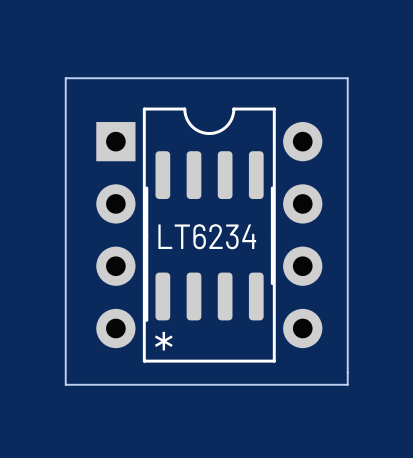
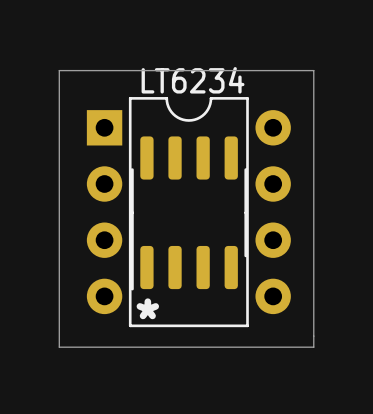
part value position: LT6234 (207, 236) -> LT6234 (193, 80)

